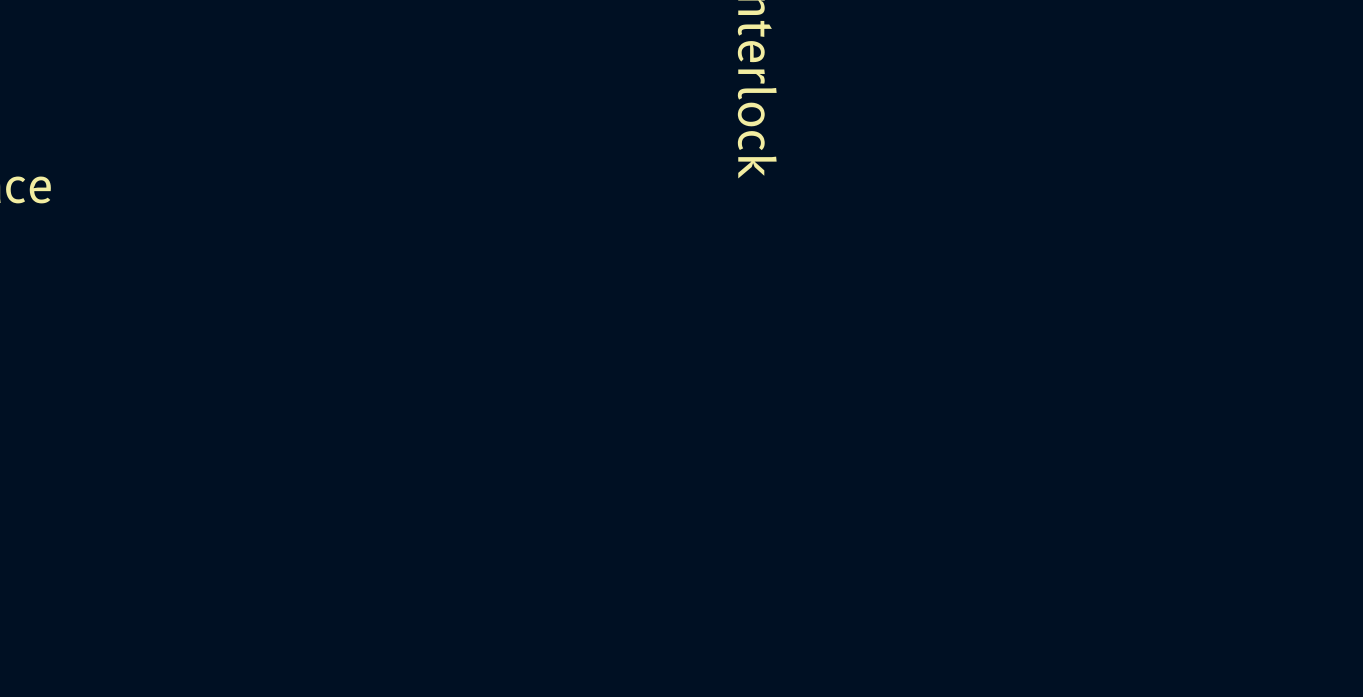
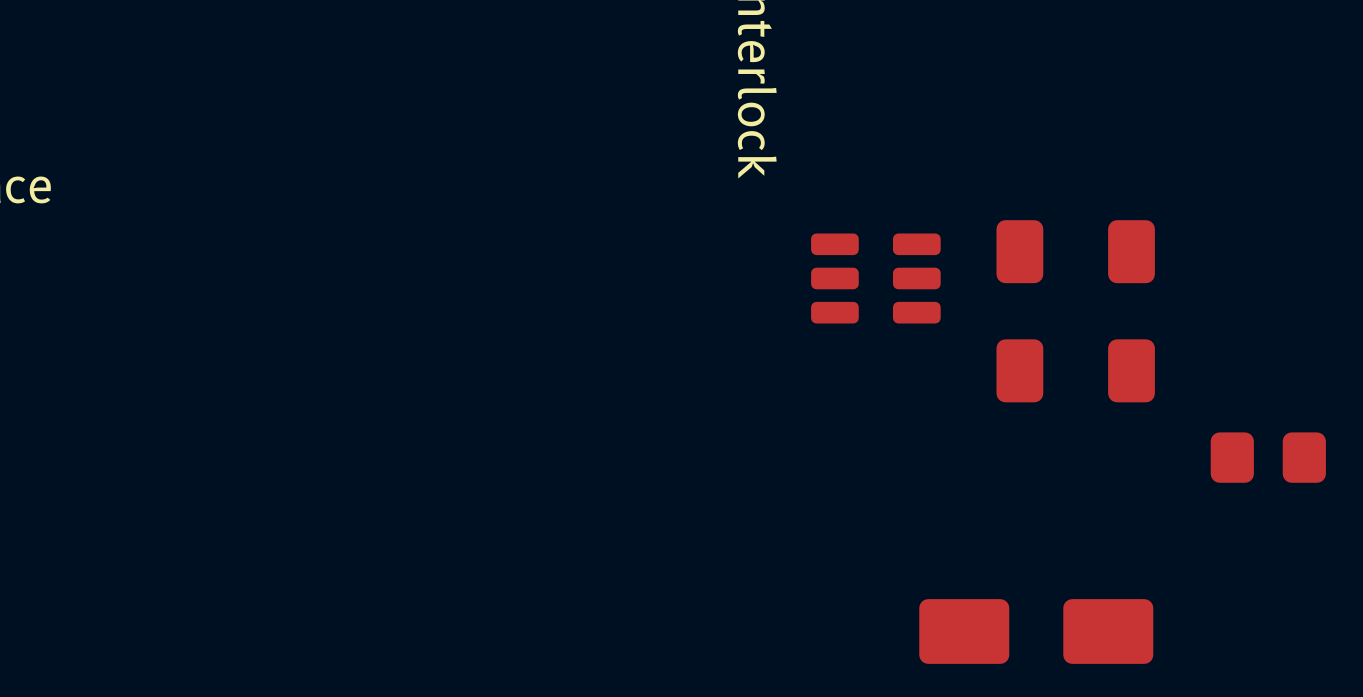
part: none -> (1075, 251)
part: none -> (875, 278)
part: none -> (1075, 370)
part: none -> (1268, 457)
part: none -> (1036, 631)

